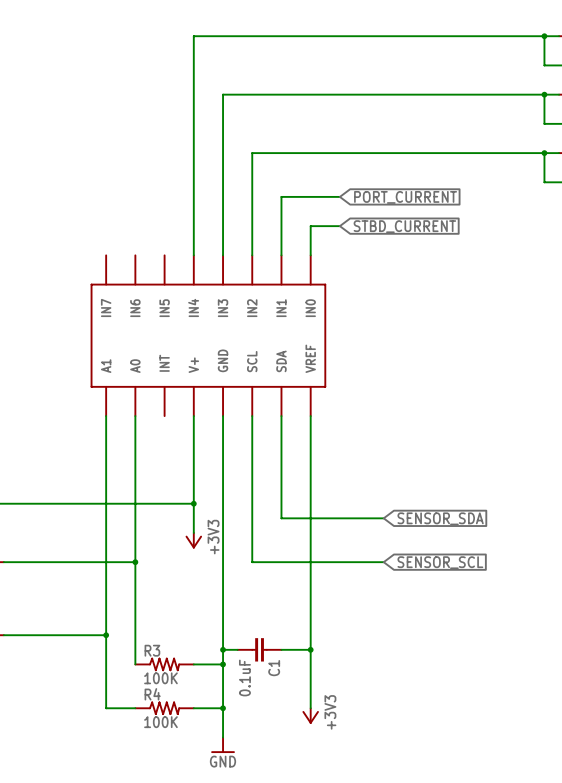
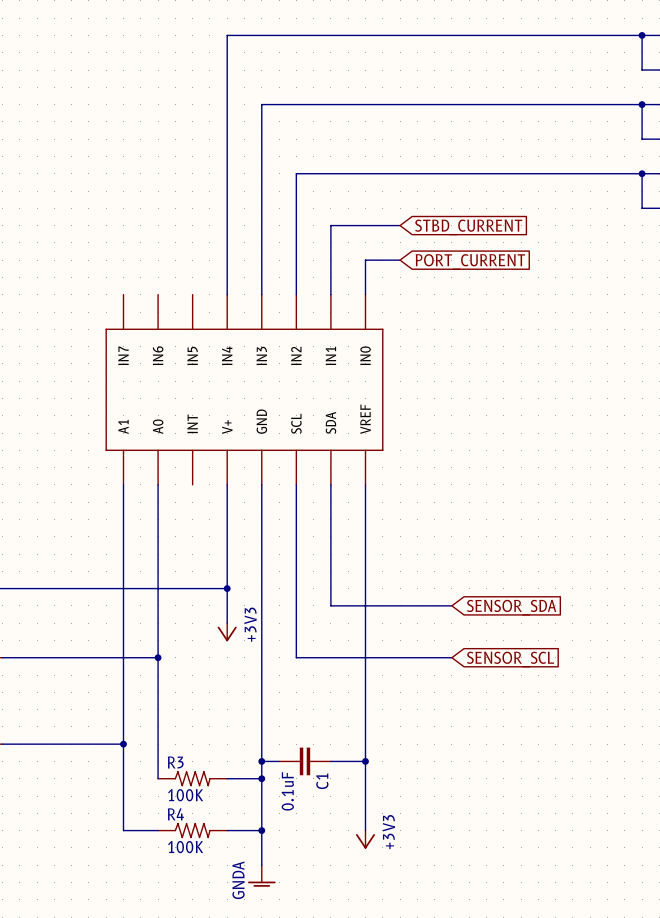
global label: PORT_CURRENT (405, 197) -> STBD_CURRENT (468, 227)
global label: STBD_CURRENT (404, 226) -> PORT_CURRENT (470, 261)
power symbol: GND (223, 745) -> GNDA (261, 875)

